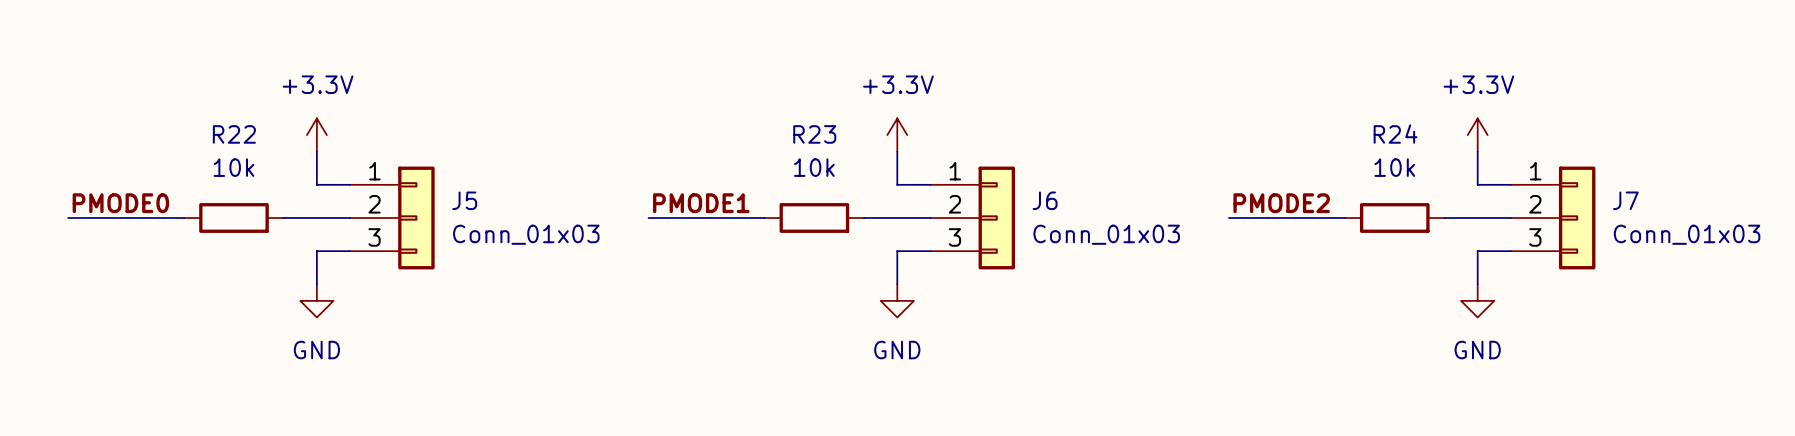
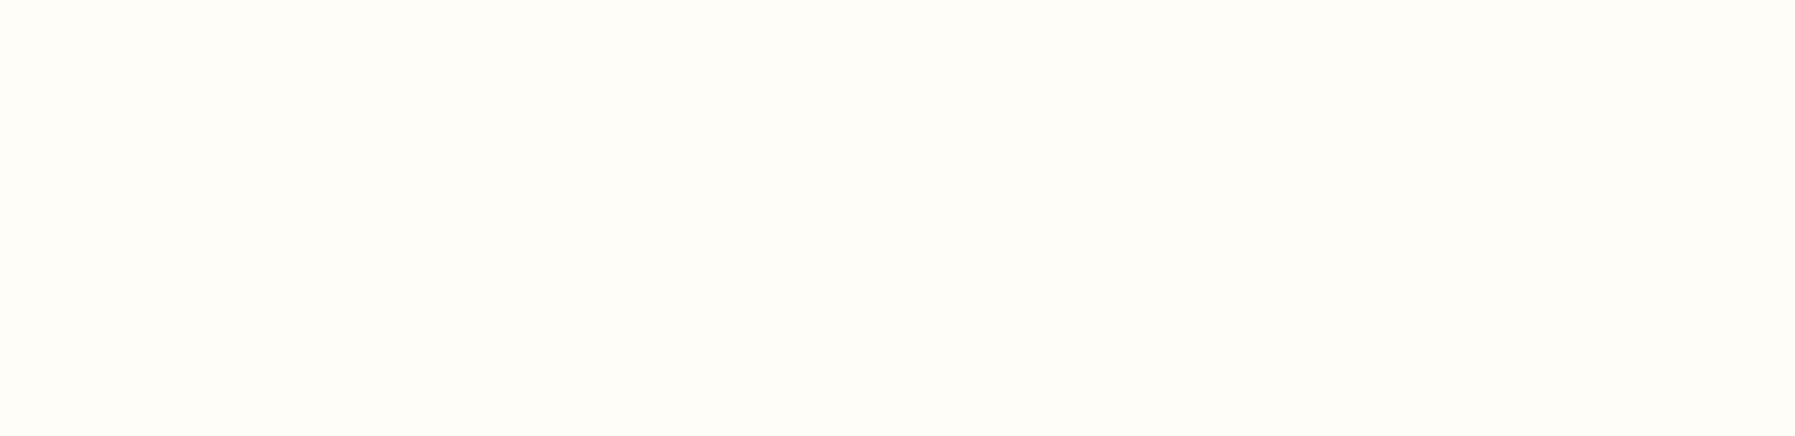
power symbol: +3.3V (316, 135) -> none
power symbol: +3.3V (897, 135) -> none
power symbol: +3.3V (1477, 135) -> none
wire: (316, 151) (316, 184) (350, 184) -> none
wire: (897, 151) (897, 184) (930, 184) -> none
wire: (1477, 151) (1477, 184) (1510, 184) -> none
label: PMODE0 (120, 203) -> none
label: PMODE1 (701, 203) -> none
label: PMODE2 (1281, 203) -> none
wire: (68, 217) (184, 217) -> none
R22: 10k (233, 217) -> none
wire: (283, 217) (350, 217) -> none
J5: Conn_01x03 (392, 217) -> none
wire: (648, 217) (764, 217) -> none
R23: 10k (814, 217) -> none
wire: (864, 217) (930, 217) -> none
J6: Conn_01x03 (972, 217) -> none
wire: (1228, 217) (1345, 217) -> none
R24: 10k (1394, 217) -> none
wire: (1444, 217) (1510, 217) -> none
J7: Conn_01x03 (1553, 217) -> none
wire: (350, 251) (316, 251) (316, 284) -> none
wire: (930, 251) (897, 251) (897, 284) -> none
wire: (1510, 251) (1477, 251) (1477, 284) -> none
power symbol: GND (316, 300) -> none
power symbol: GND (897, 300) -> none
power symbol: GND (1477, 300) -> none

